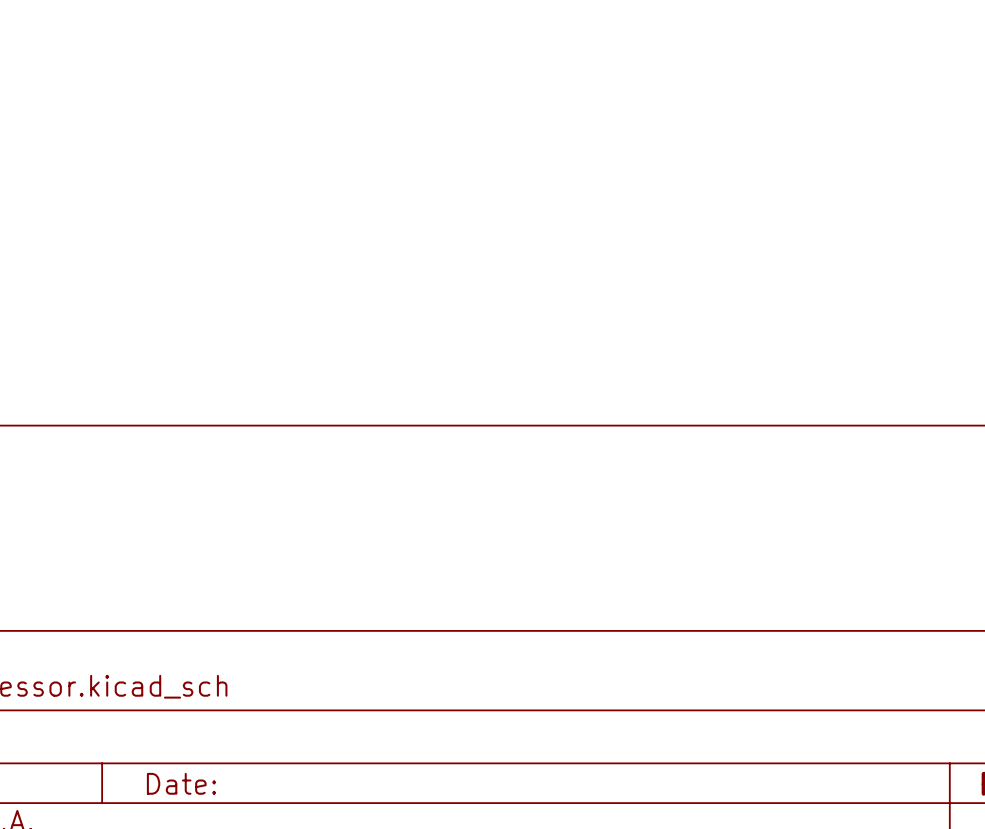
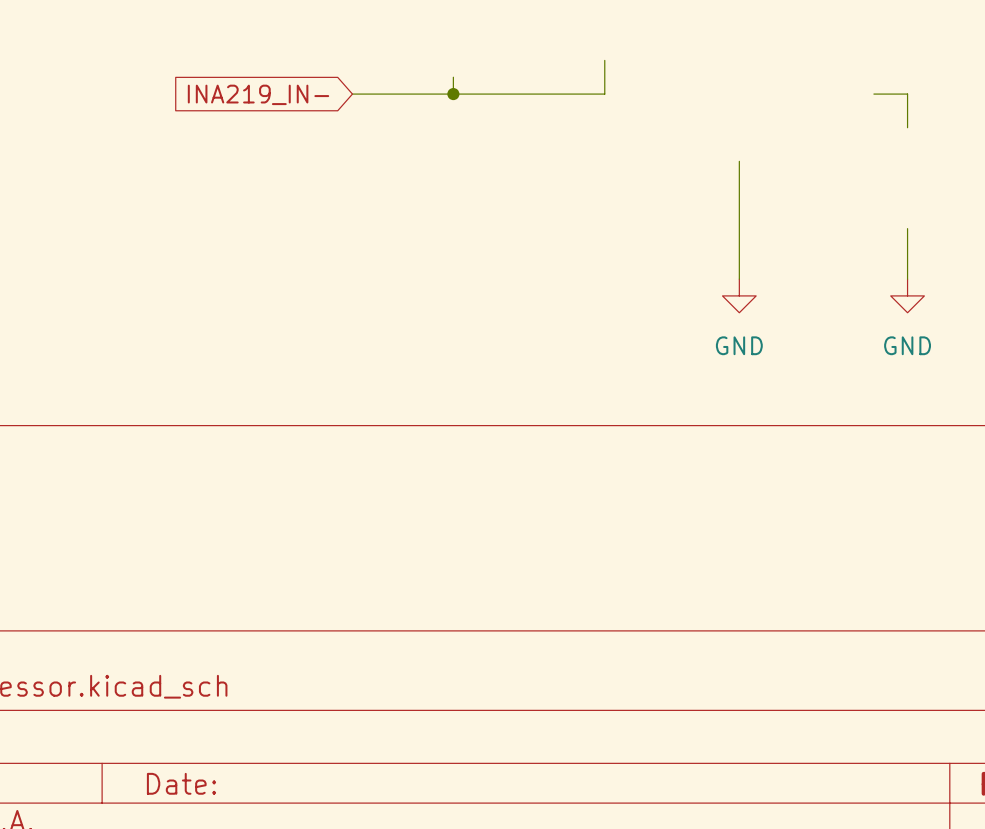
wire: none -> (604, 60) (604, 94) (352, 94)
wire: none -> (453, 77) (453, 94)
global label: none -> INA219_IN- (258, 94)
junction: none -> (453, 94)
wire: none -> (873, 94) (907, 94) (907, 127)
wire: none -> (739, 161) (739, 279)
wire: none -> (907, 228) (907, 279)
power symbol: none -> GND (739, 295)
power symbol: none -> GND (907, 295)

